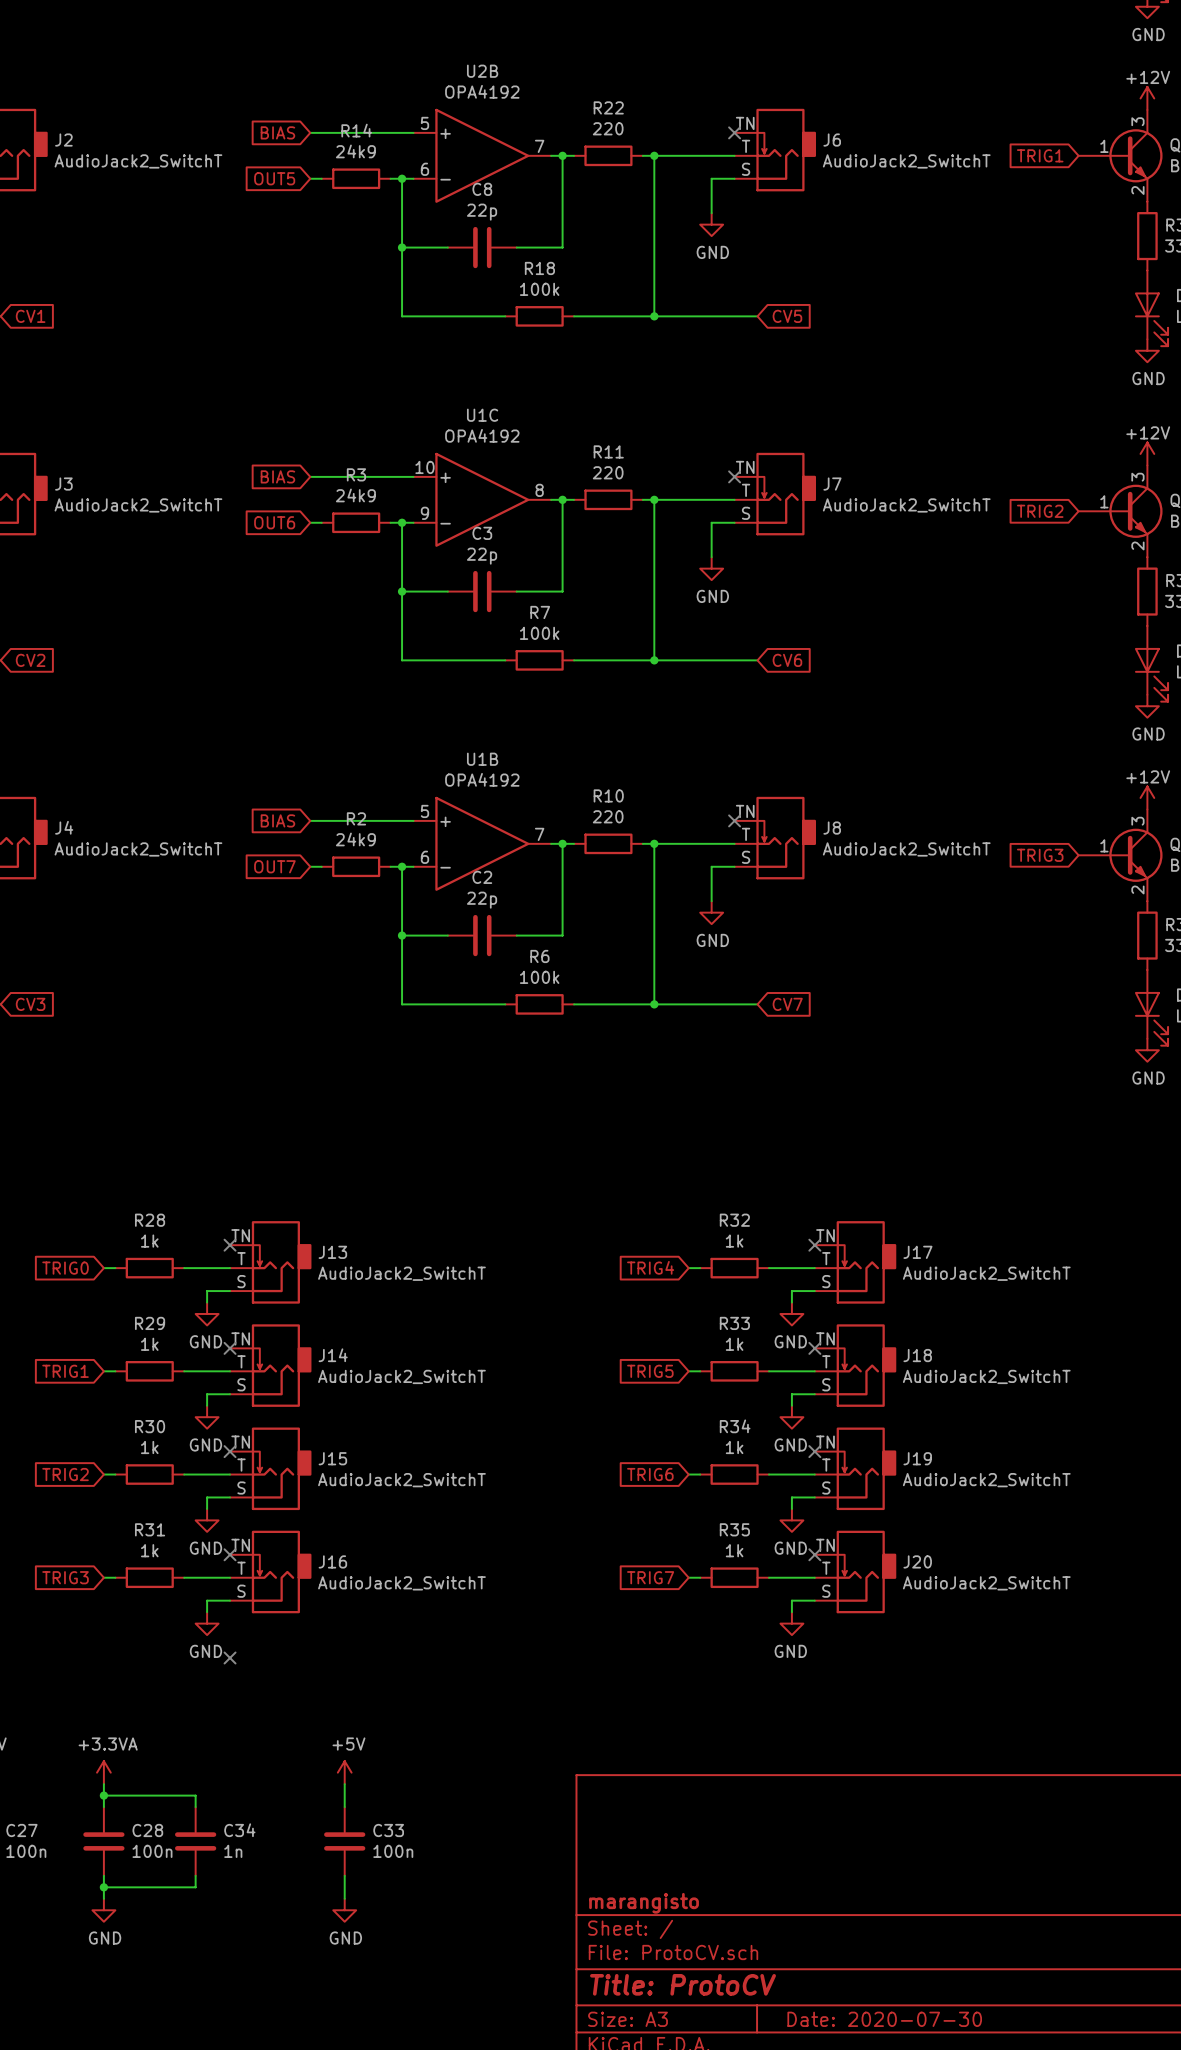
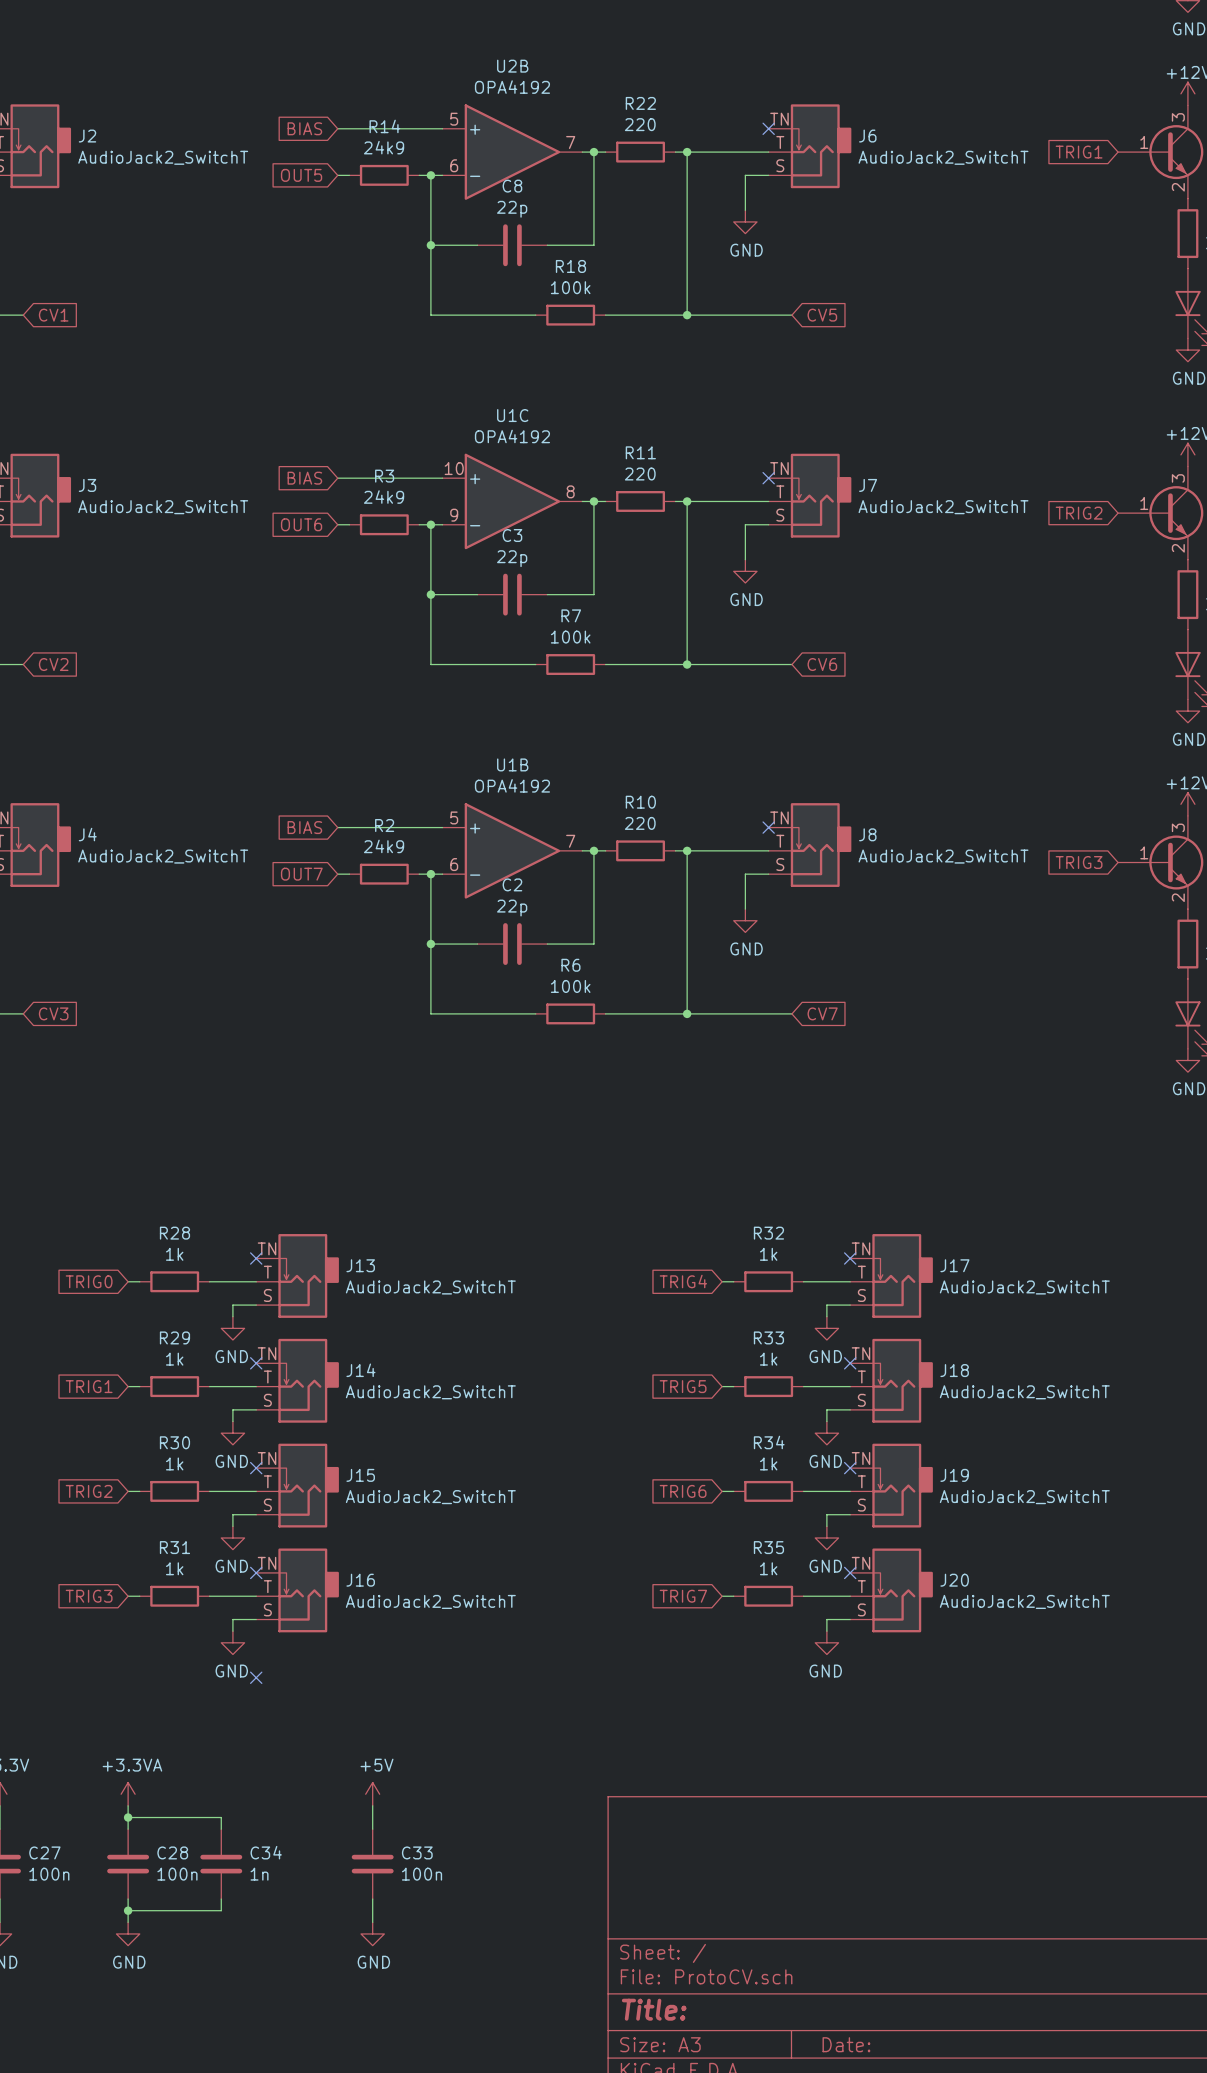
title block: marangisto (644, 1903) -> none
title block: Title: ProtoCV (683, 1984) -> Title: (654, 2009)
title block: Date: 2020-07-30 (884, 2019) -> Date: (846, 2044)

